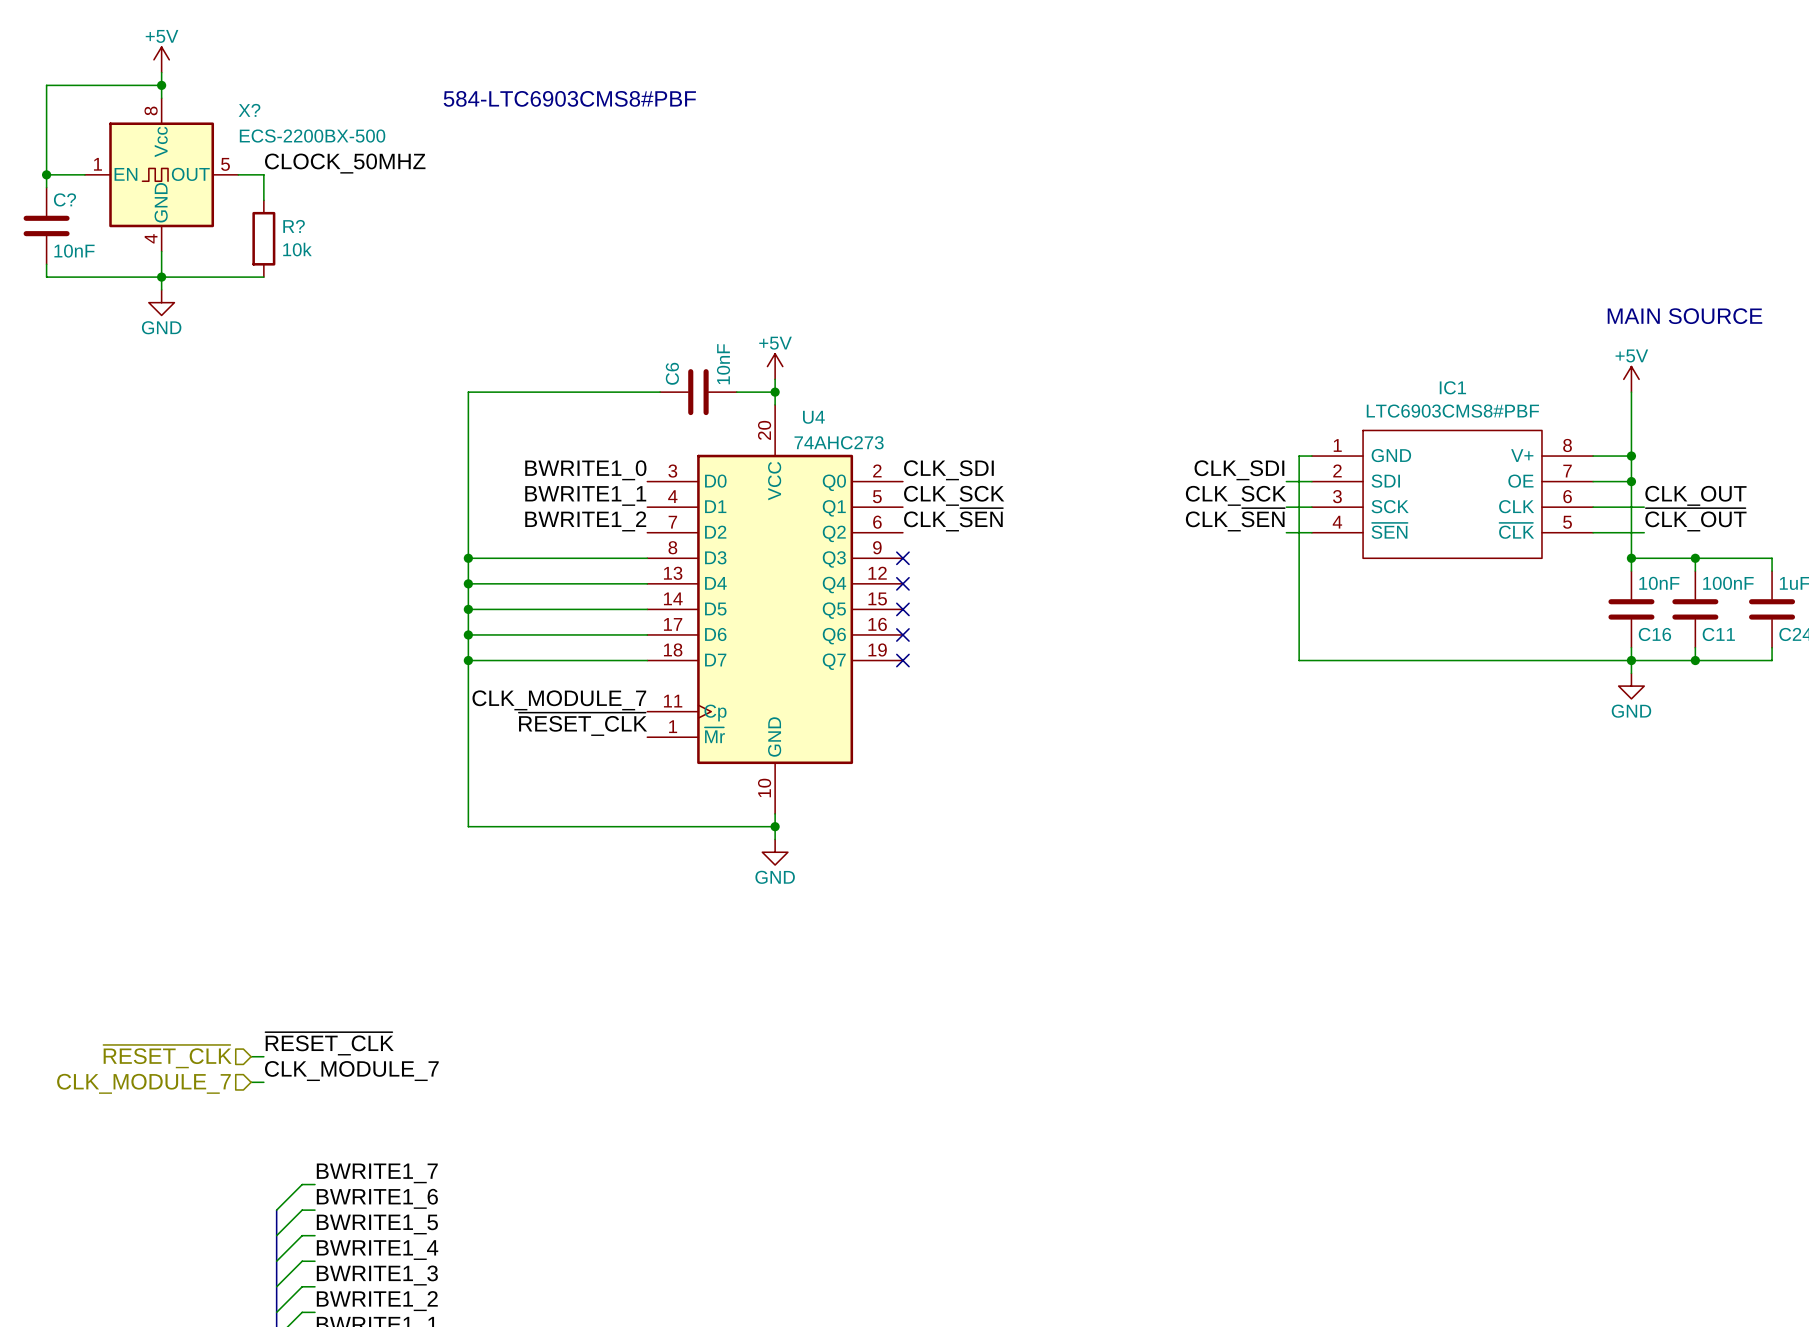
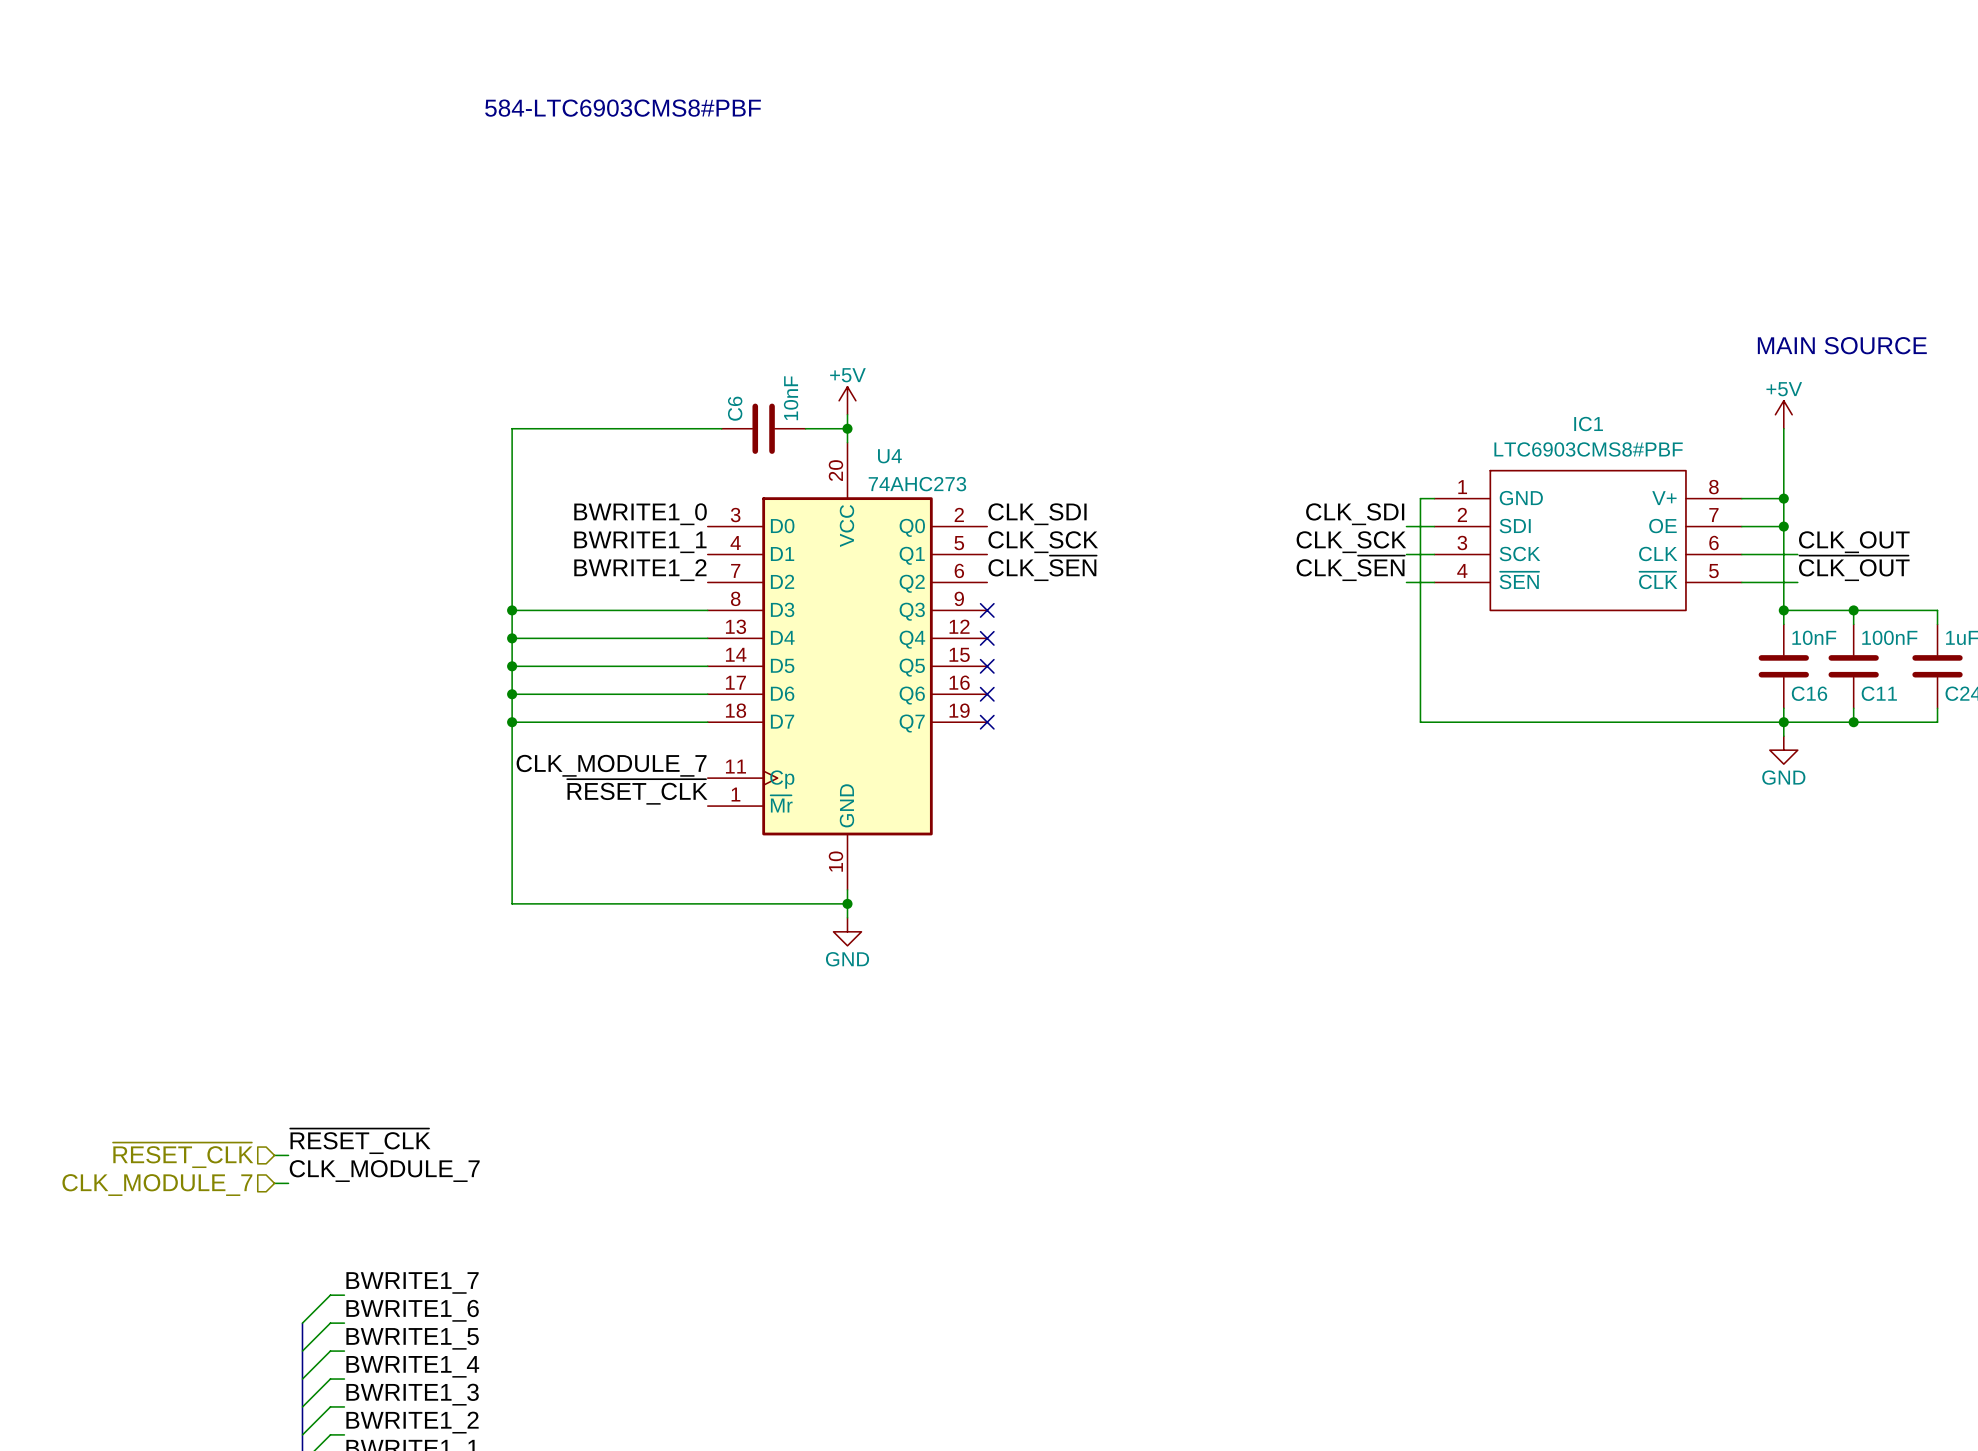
power symbol: +5V (161, 59) -> none
wire: (161, 72) (161, 98) -> none
wire: (161, 85) (46, 85) (46, 187) -> none
junction: (161, 85) -> none
label: CLOCK_50MHZ (345, 163) -> none
wire: (46, 174) (84, 174) -> none
junction: (46, 174) -> none
X?: ECS-2200BX-500 (161, 174) -> none
wire: (238, 174) (263, 174) (263, 200) -> none
C?: 10nF (46, 225) -> none
R?: 10k (263, 238) -> none
wire: (161, 251) (161, 289) -> none
wire: (46, 264) (46, 277) (263, 277) -> none
junction: (161, 277) -> none
power symbol: GND (161, 302) -> none

